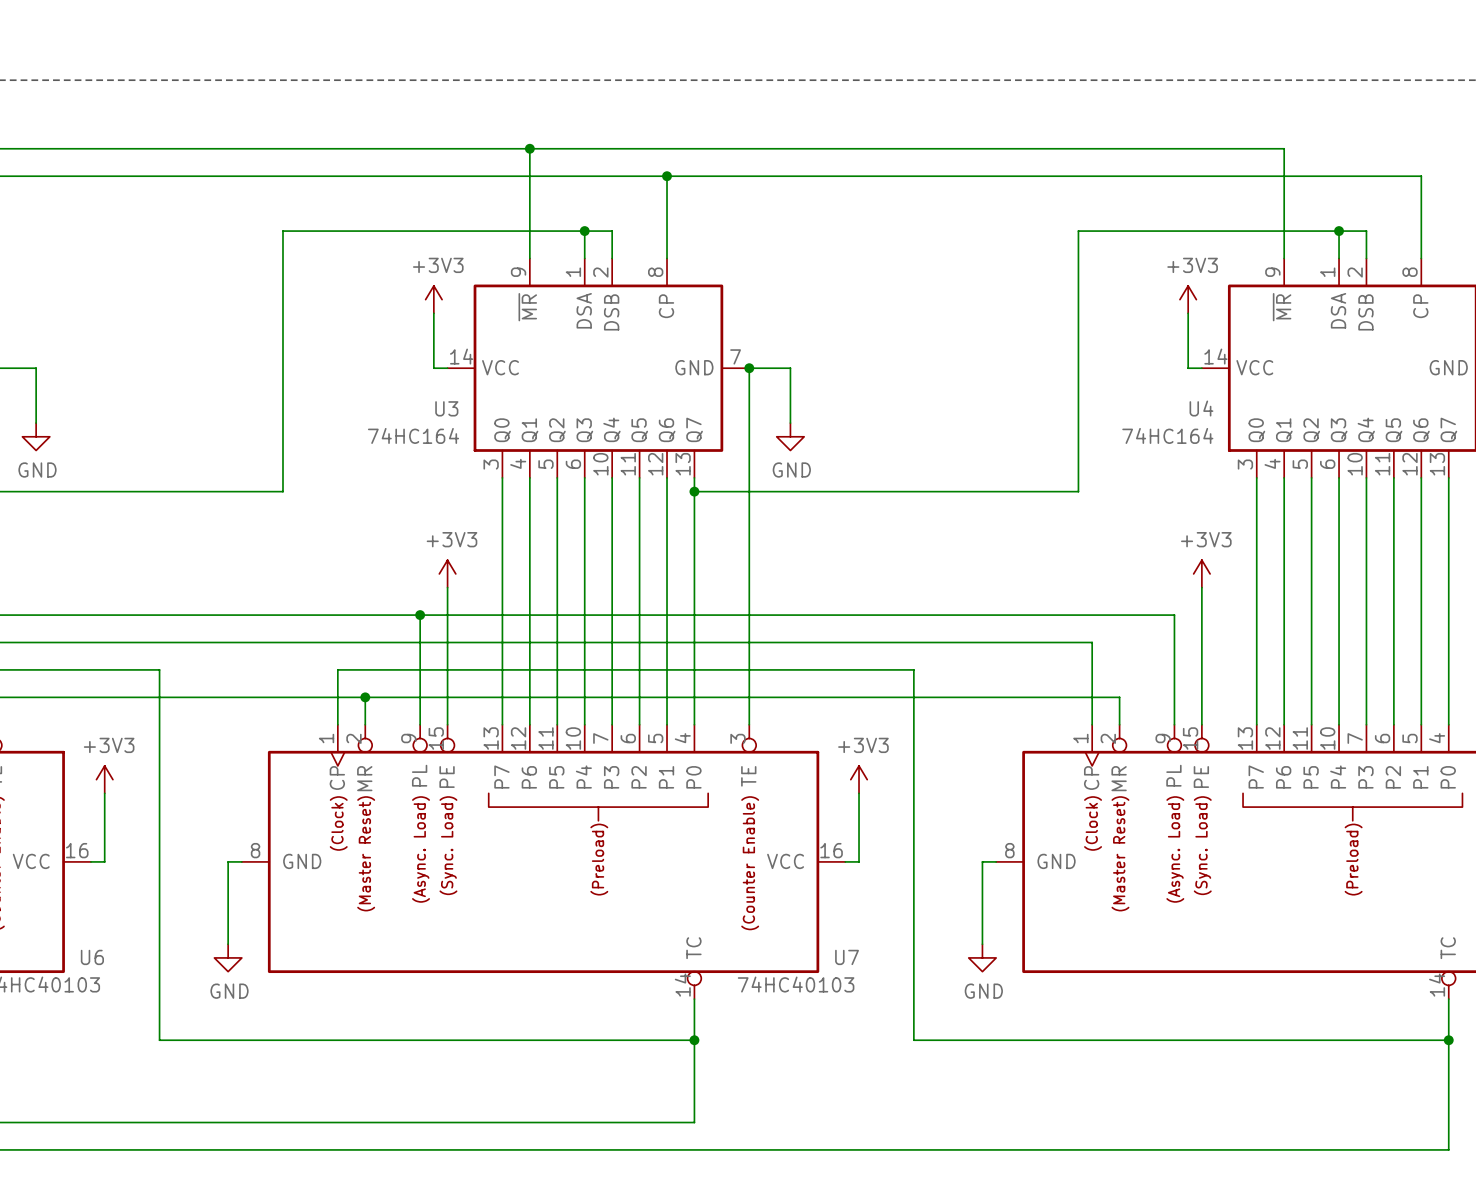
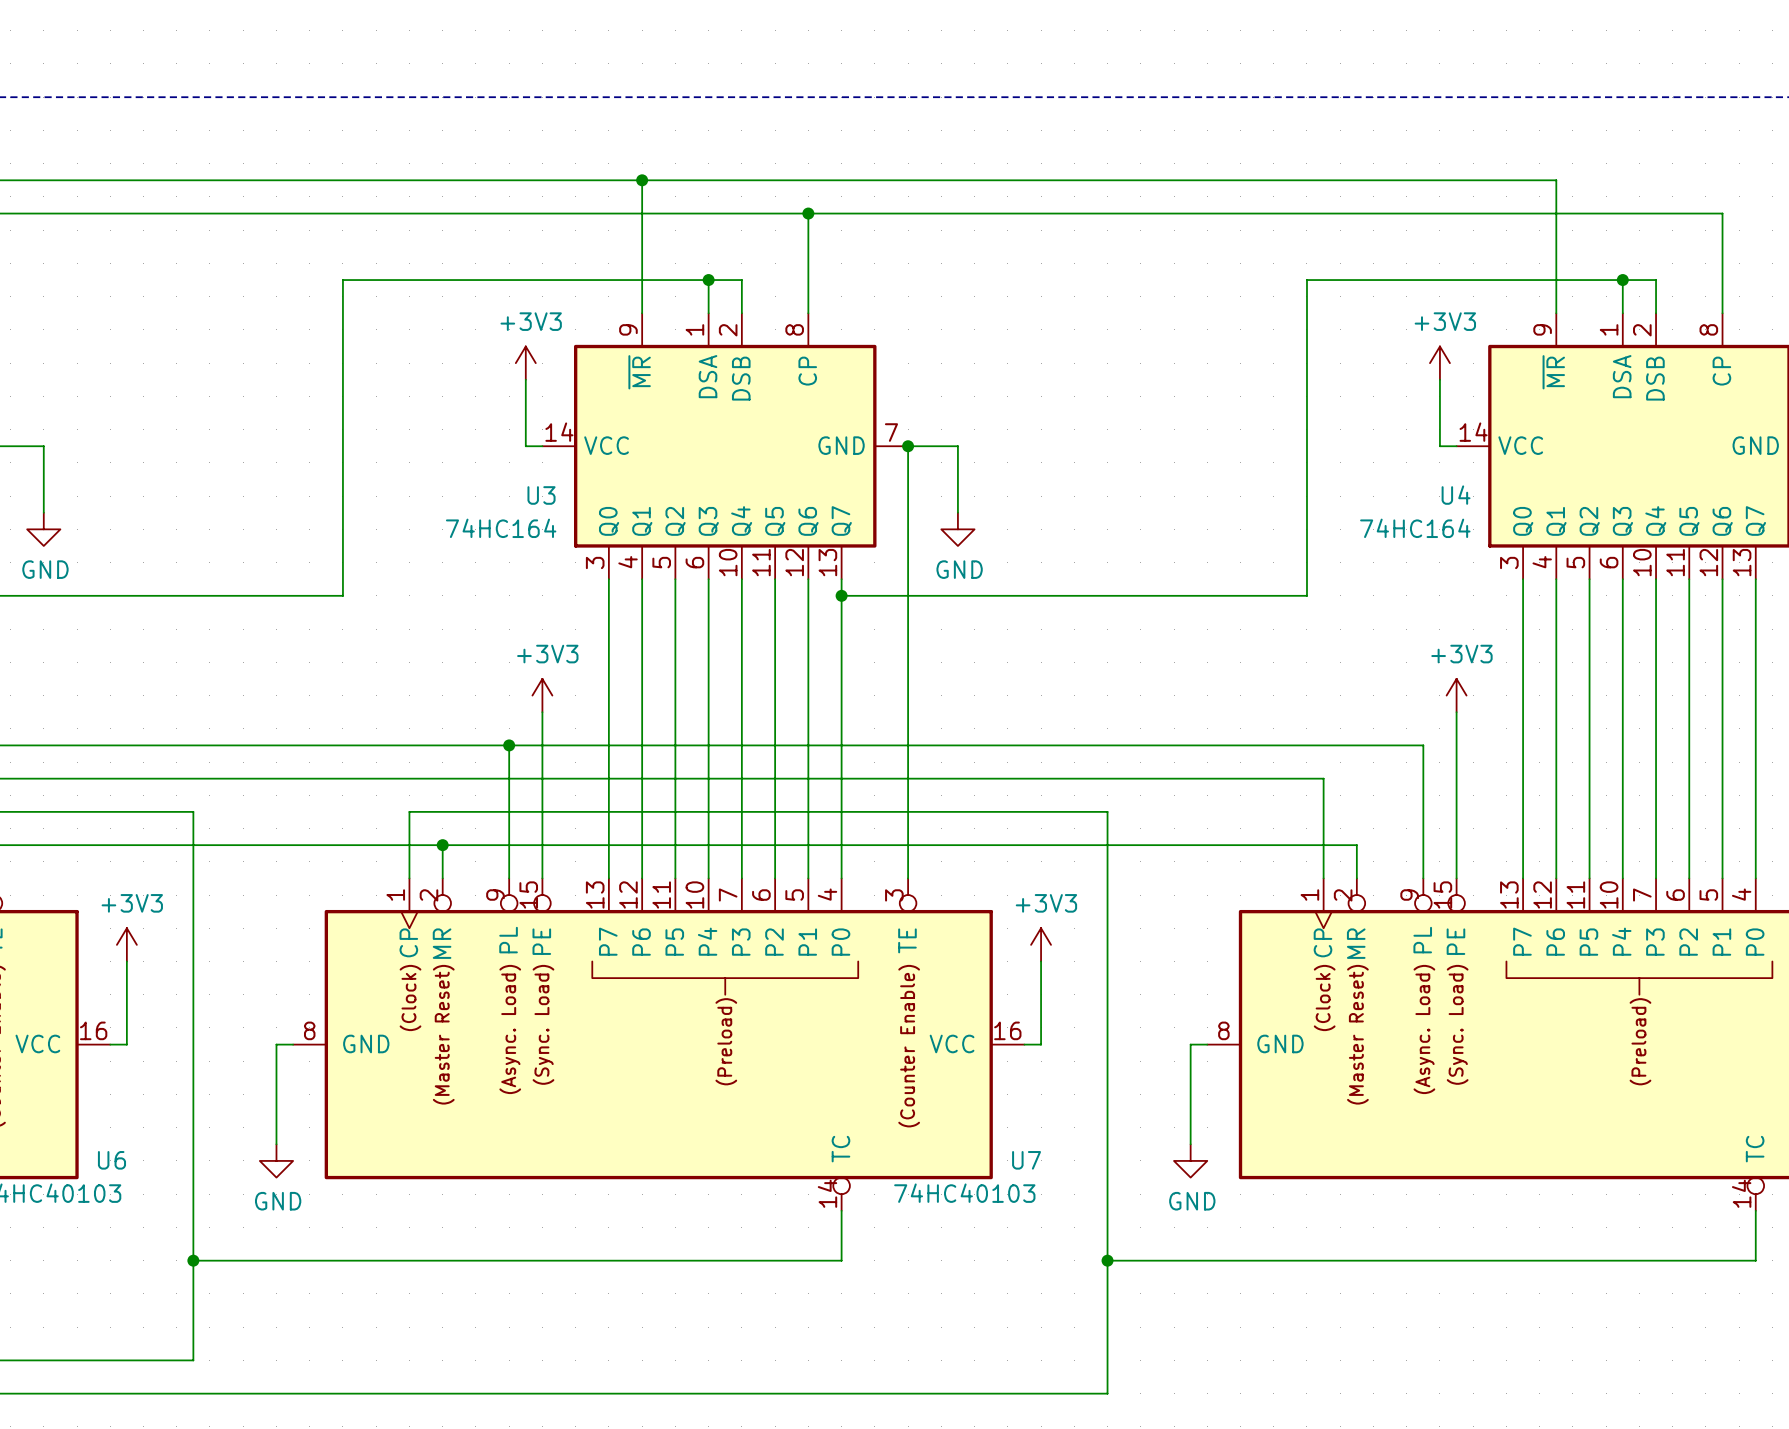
junction: none -> (193, 1260)
wire: (694, 1040) (694, 1122) (159, 1122) -> (193, 1260) (193, 1360)
junction: (694, 1040) -> none
junction: none -> (1107, 1260)
wire: (1448, 1040) (1448, 1149) (913, 1149) -> (1107, 1260) (1107, 1393)
junction: (1448, 1040) -> none

